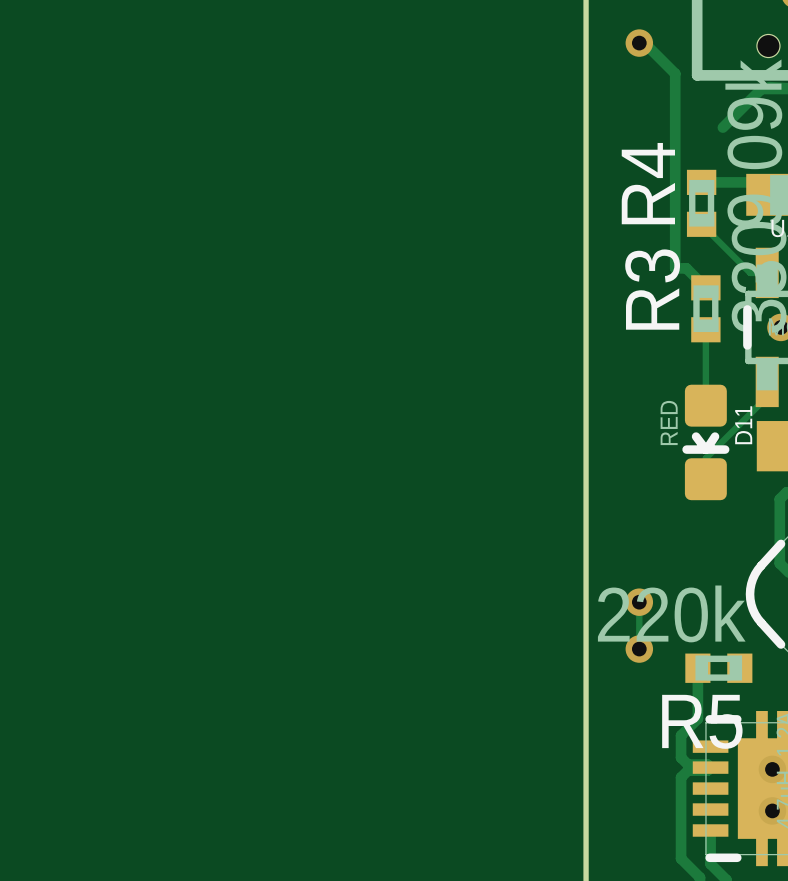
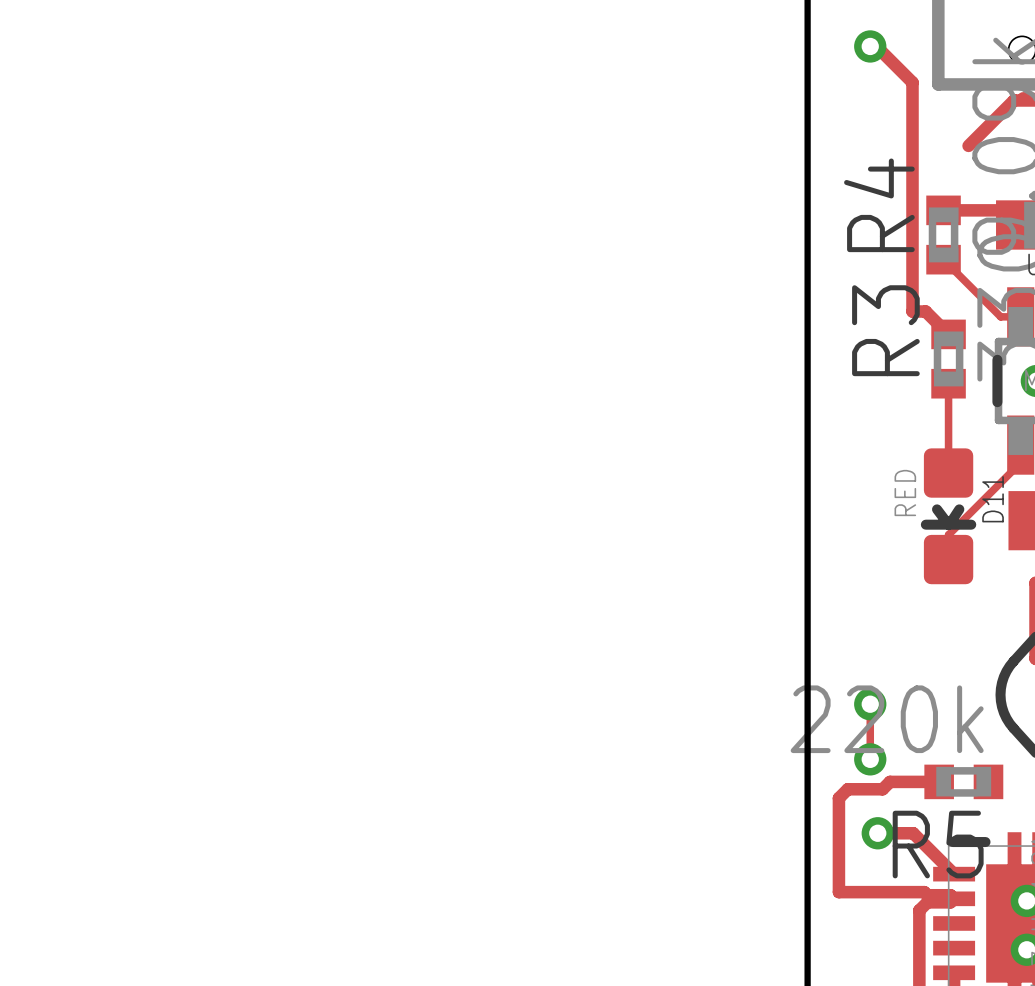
track: (697, 668) (697, 718) (681, 735) (681, 757) (685, 761) -> (939, 781) (890, 781) (882, 789) (847, 789) (838, 798) (838, 892) (924, 892)
track: none -> (877, 833) (913, 833) (954, 874)
via: none -> (877, 833)

